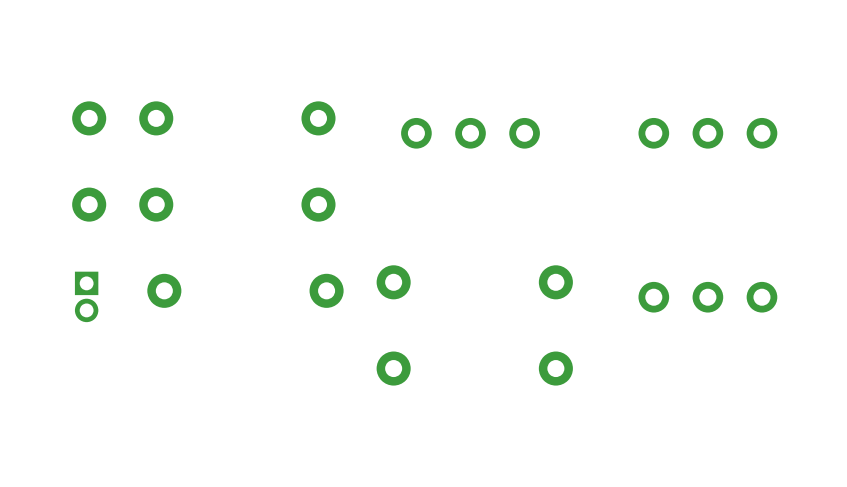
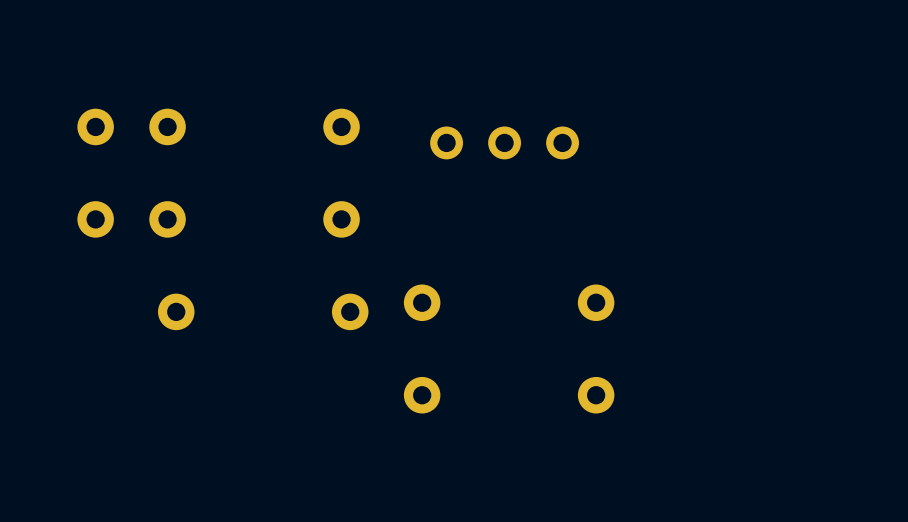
part: (707, 133) -> none
part: (86, 296) -> none
part: (707, 297) -> none

